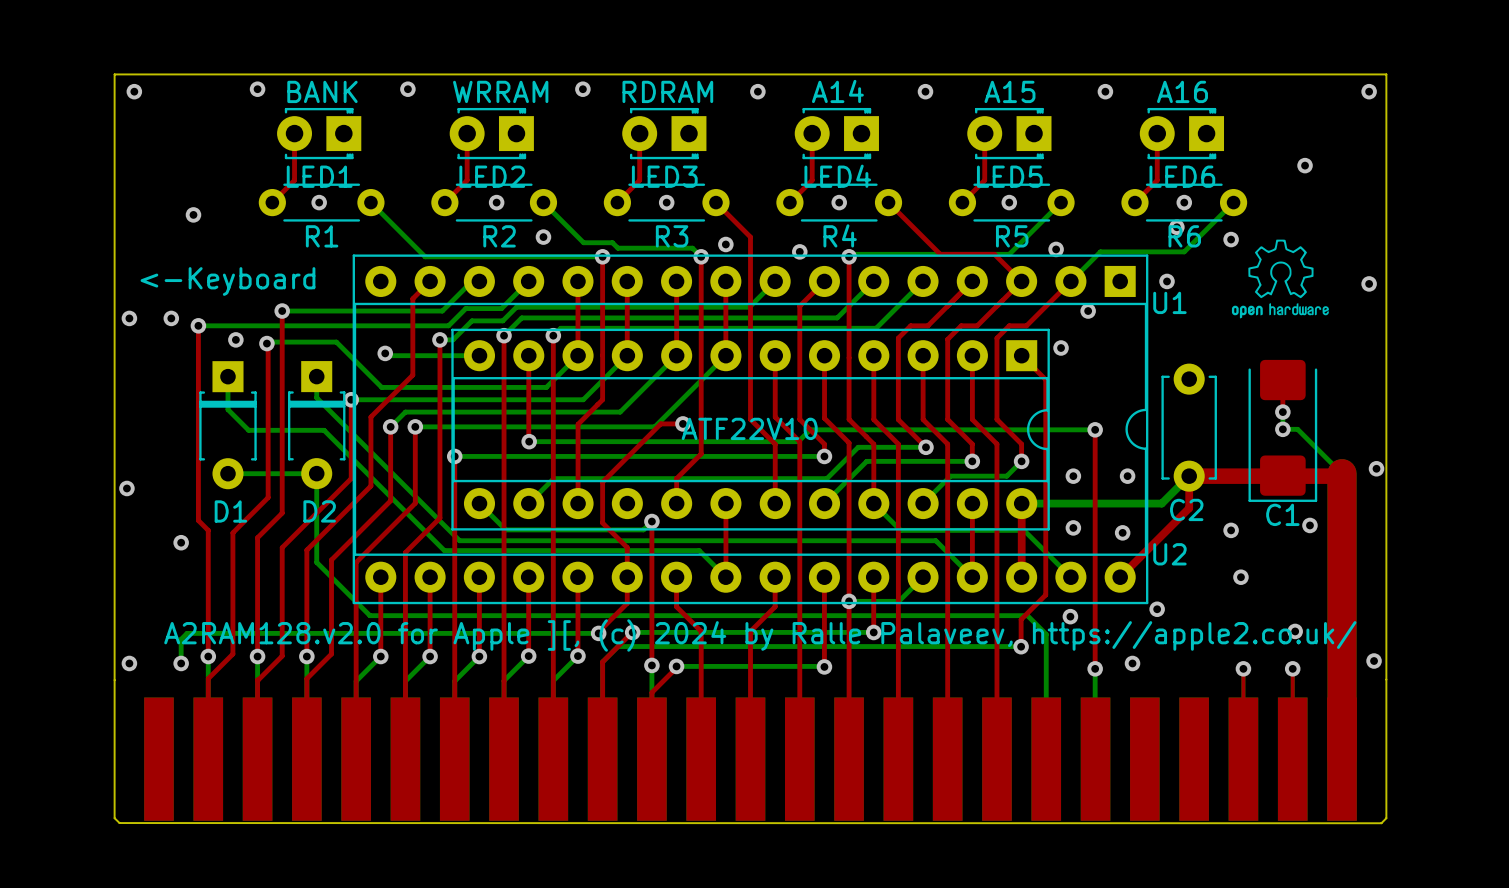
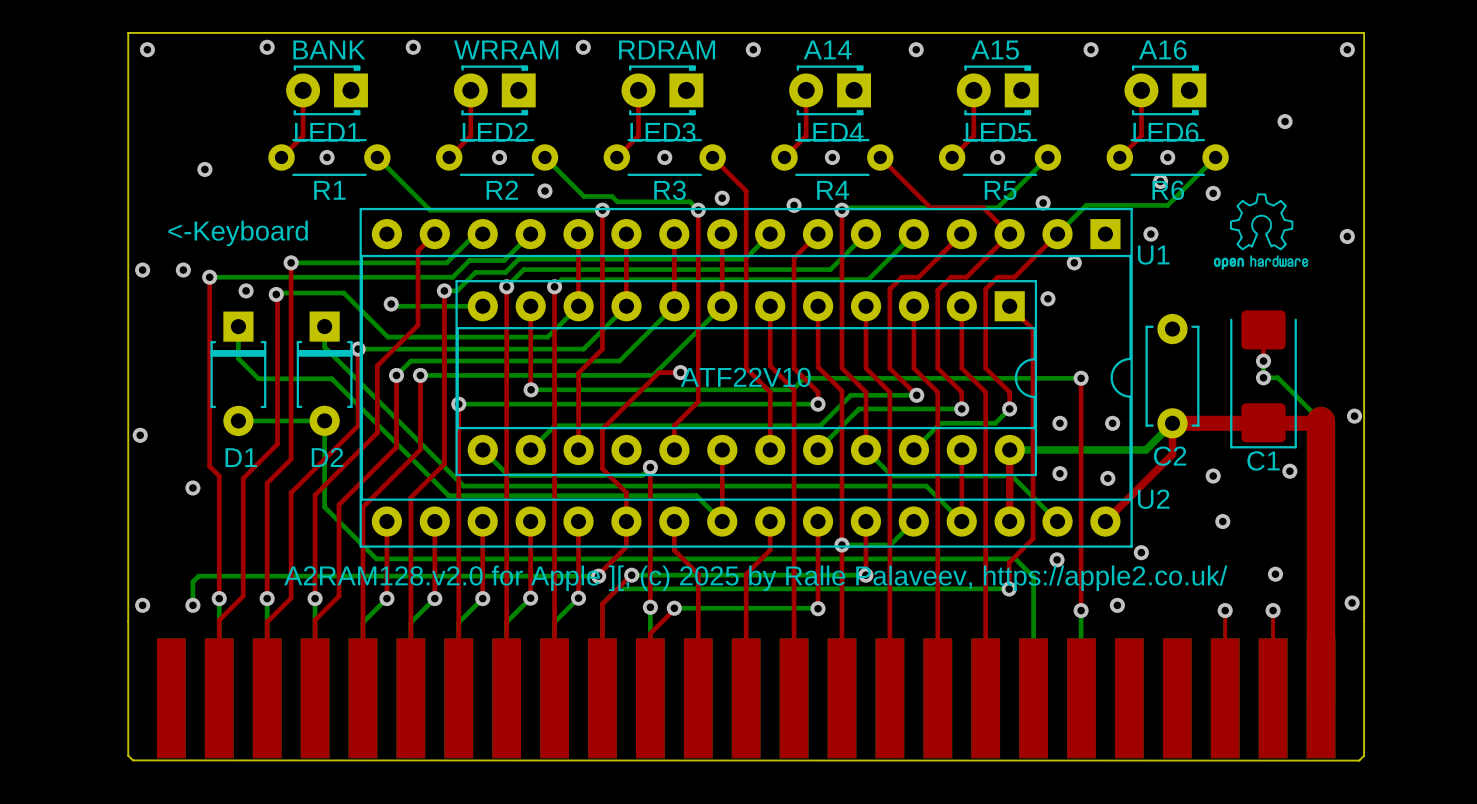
text: A2RAM128.v2.0 for Apple ][, (c) 2024 by Ralle Palaveev, https://apple2.co.uk/ (760, 635) -> A2RAM128.v2.0 for Apple ][, (c) 2025 by Ralle Palaveev, https://apple2.co.uk/ (755, 578)

